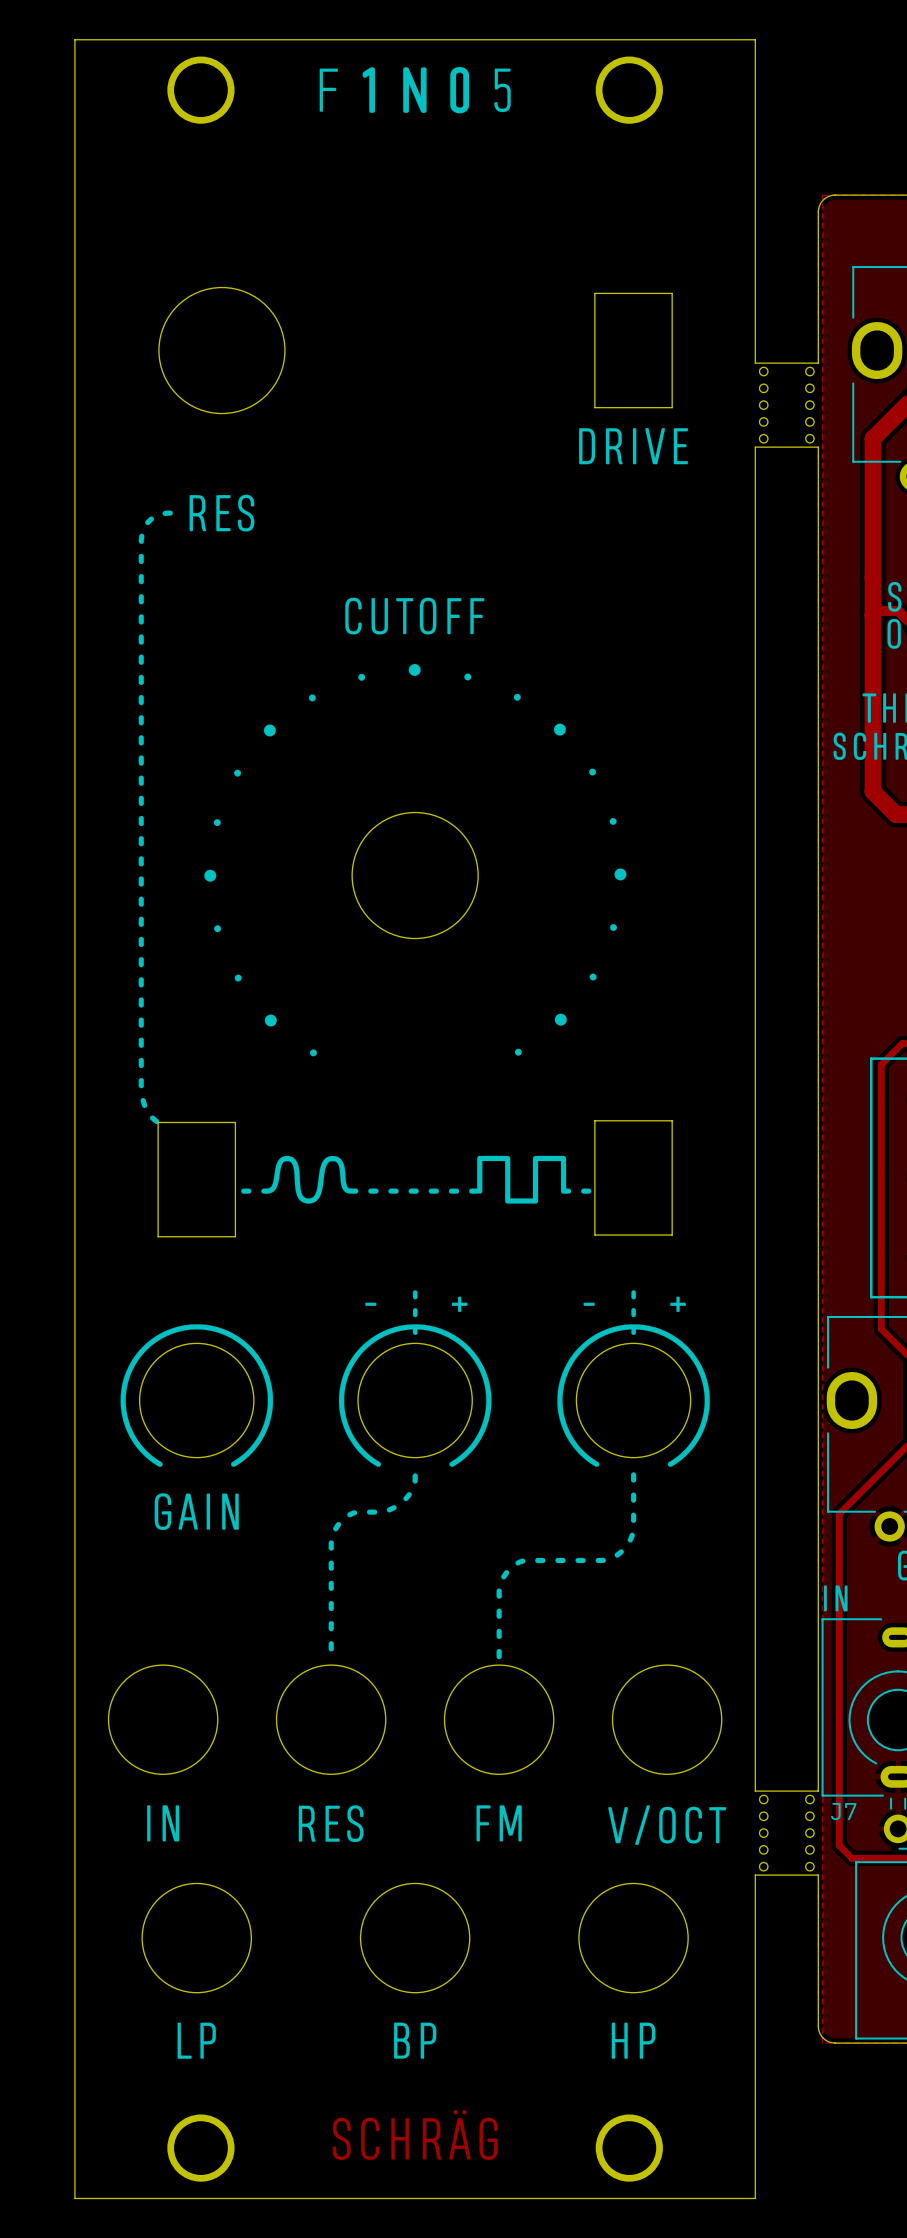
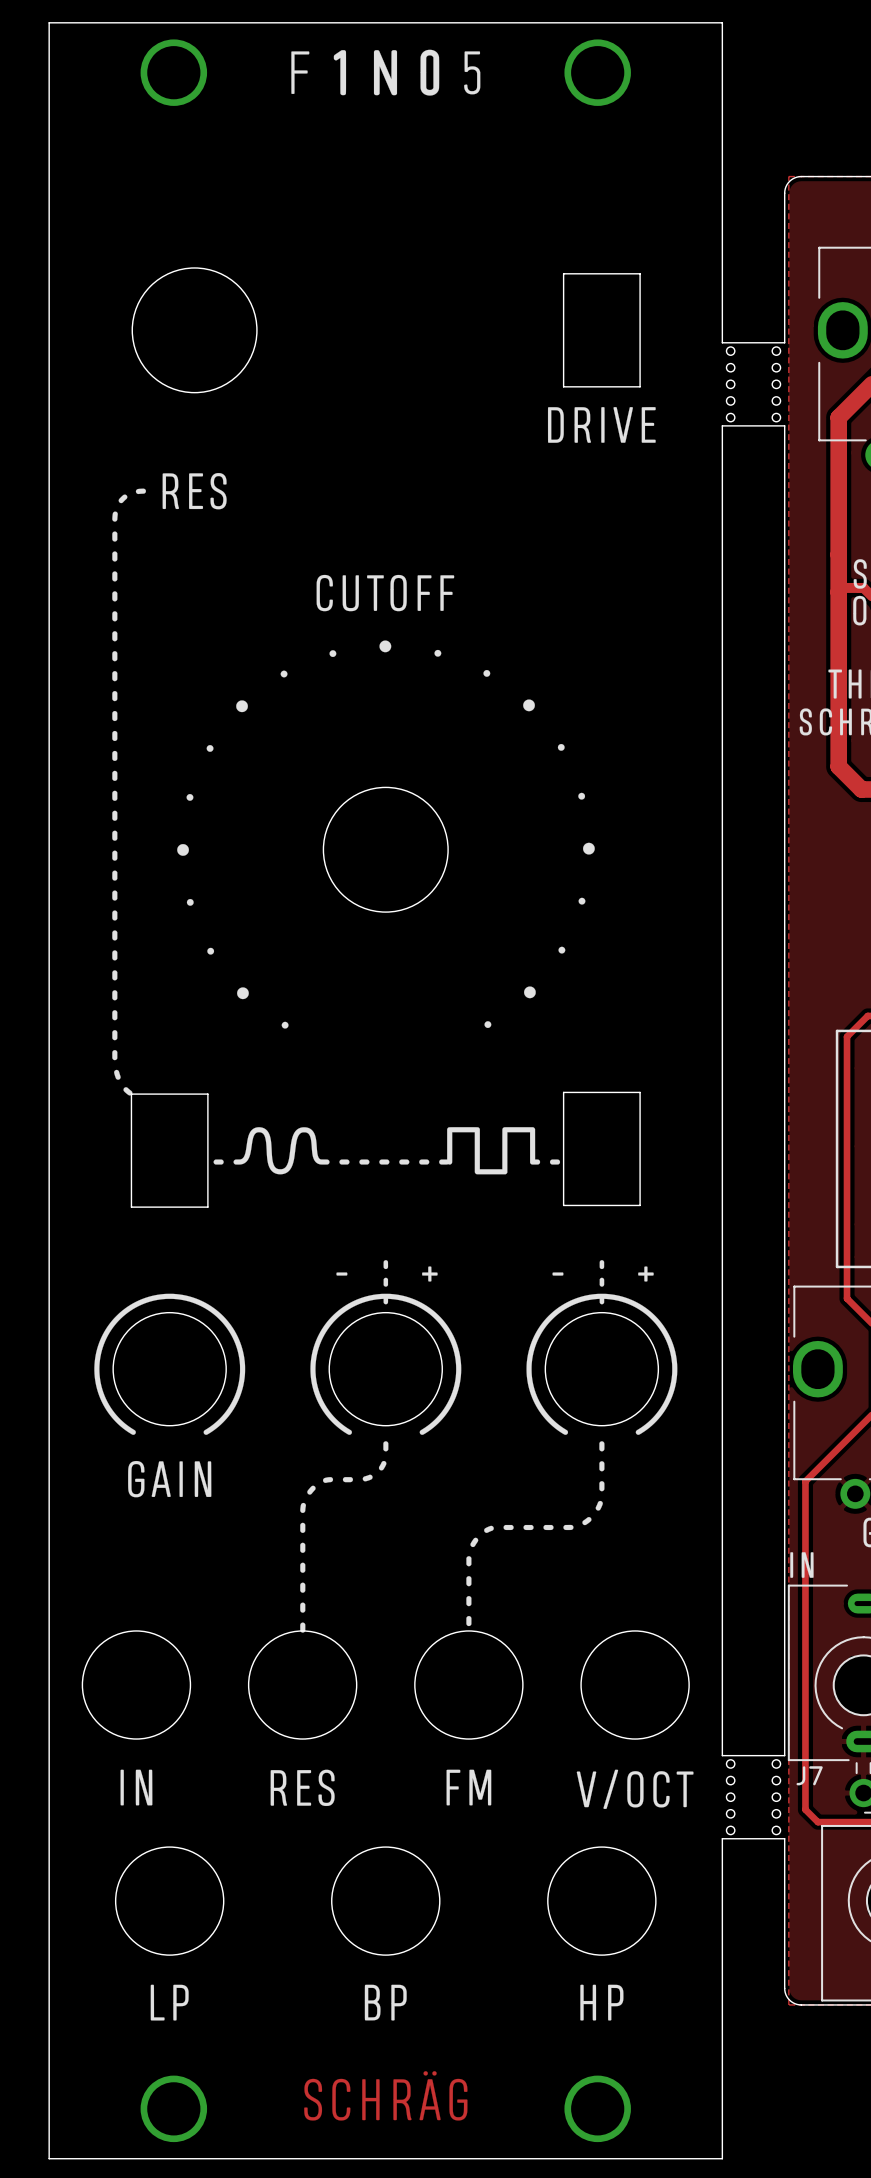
drawing shape: [120, 66, 727, 2059] -> [94, 49, 694, 2021]

